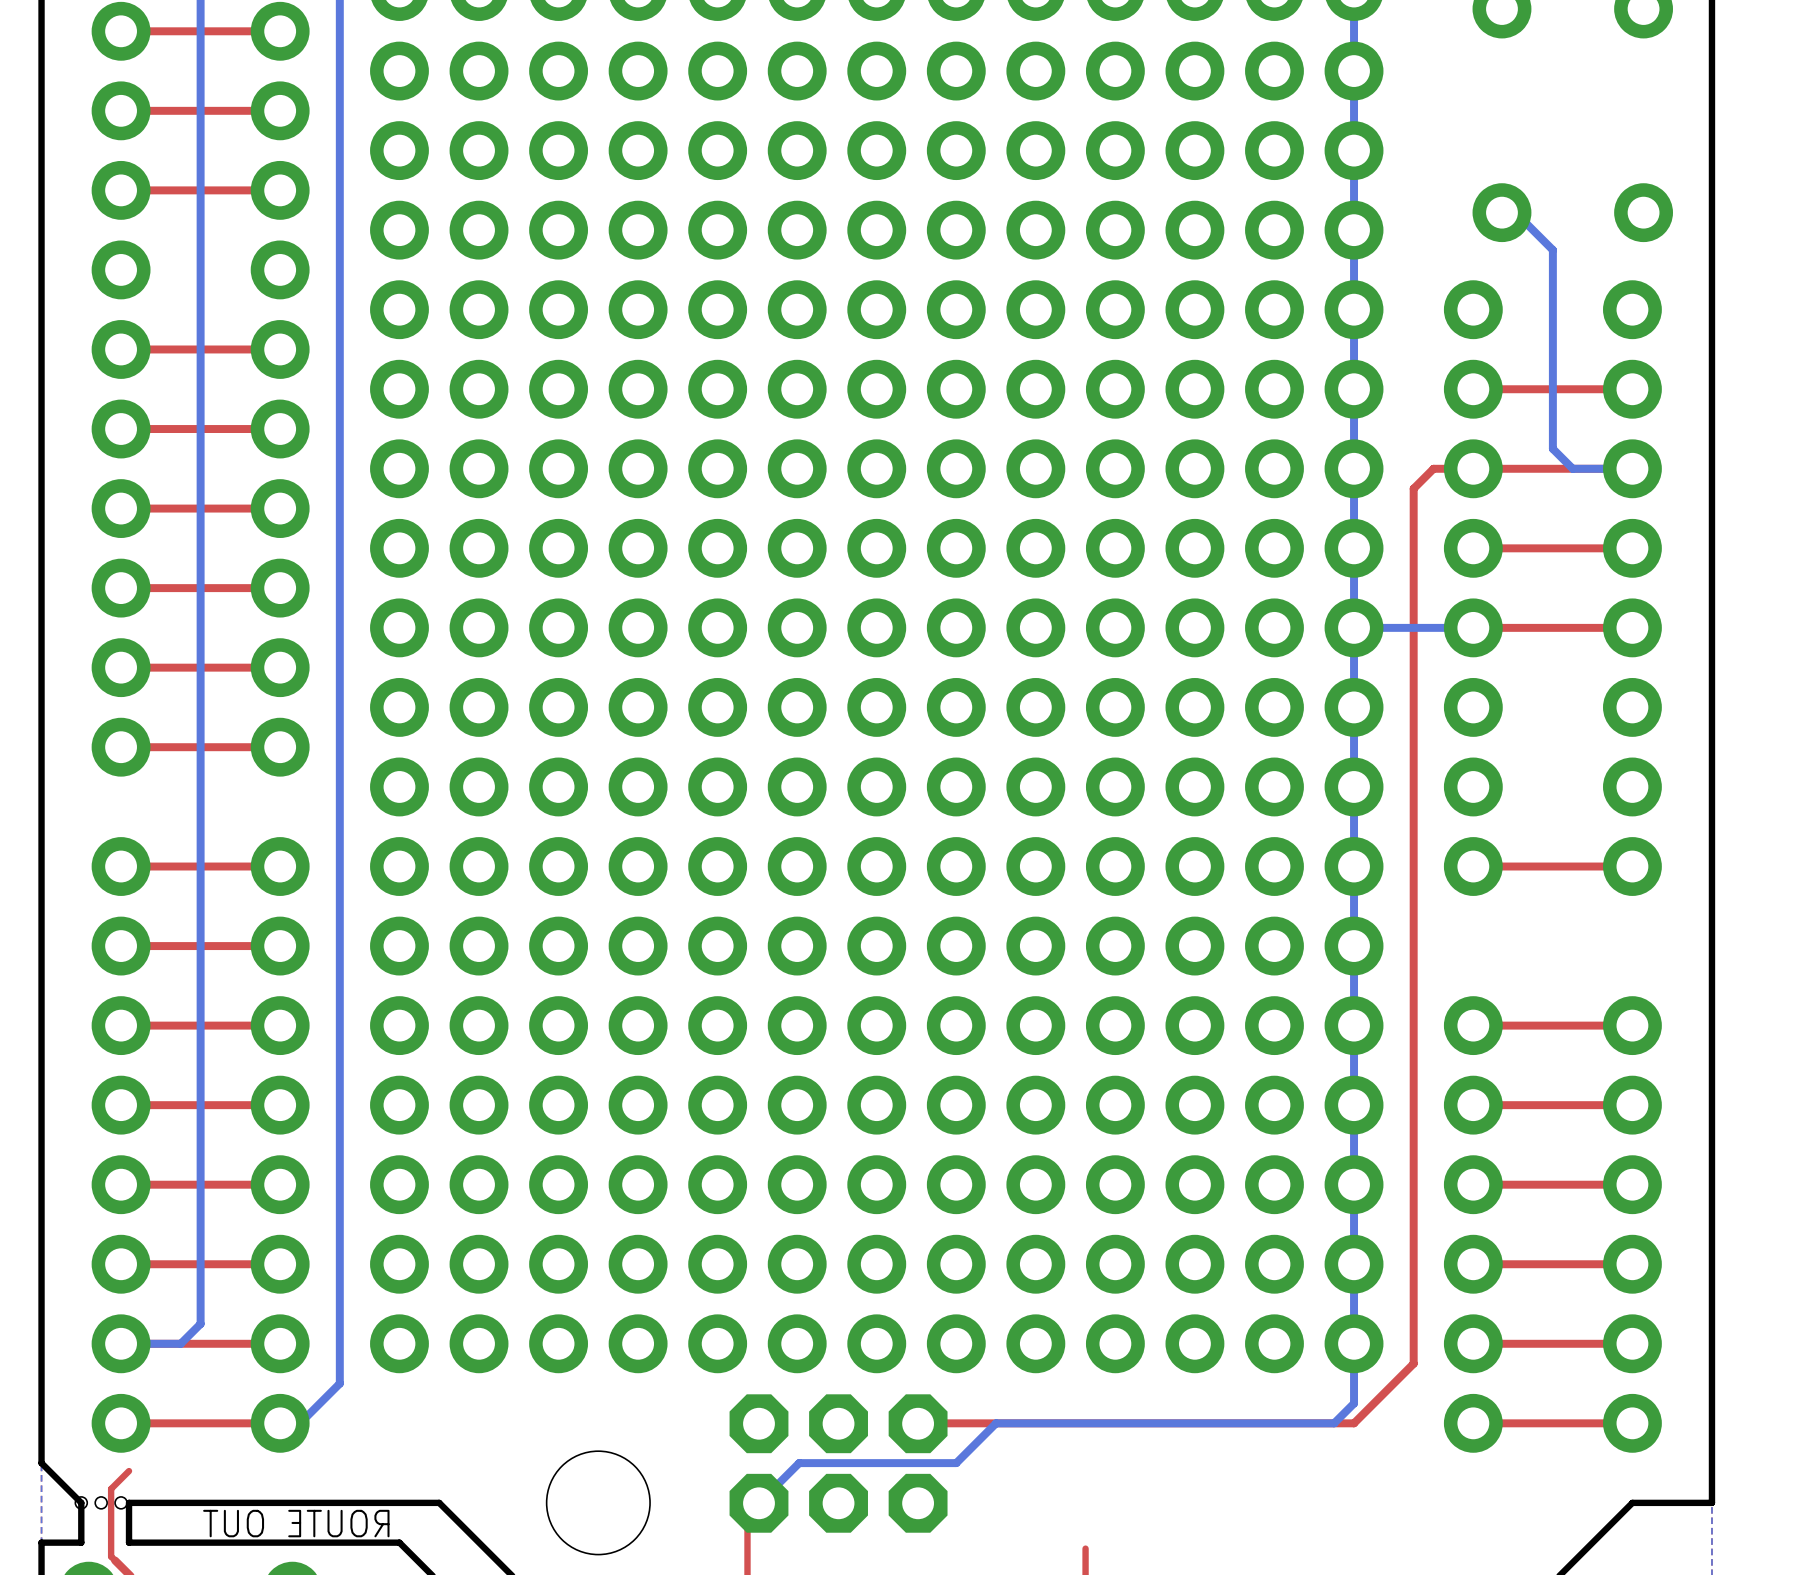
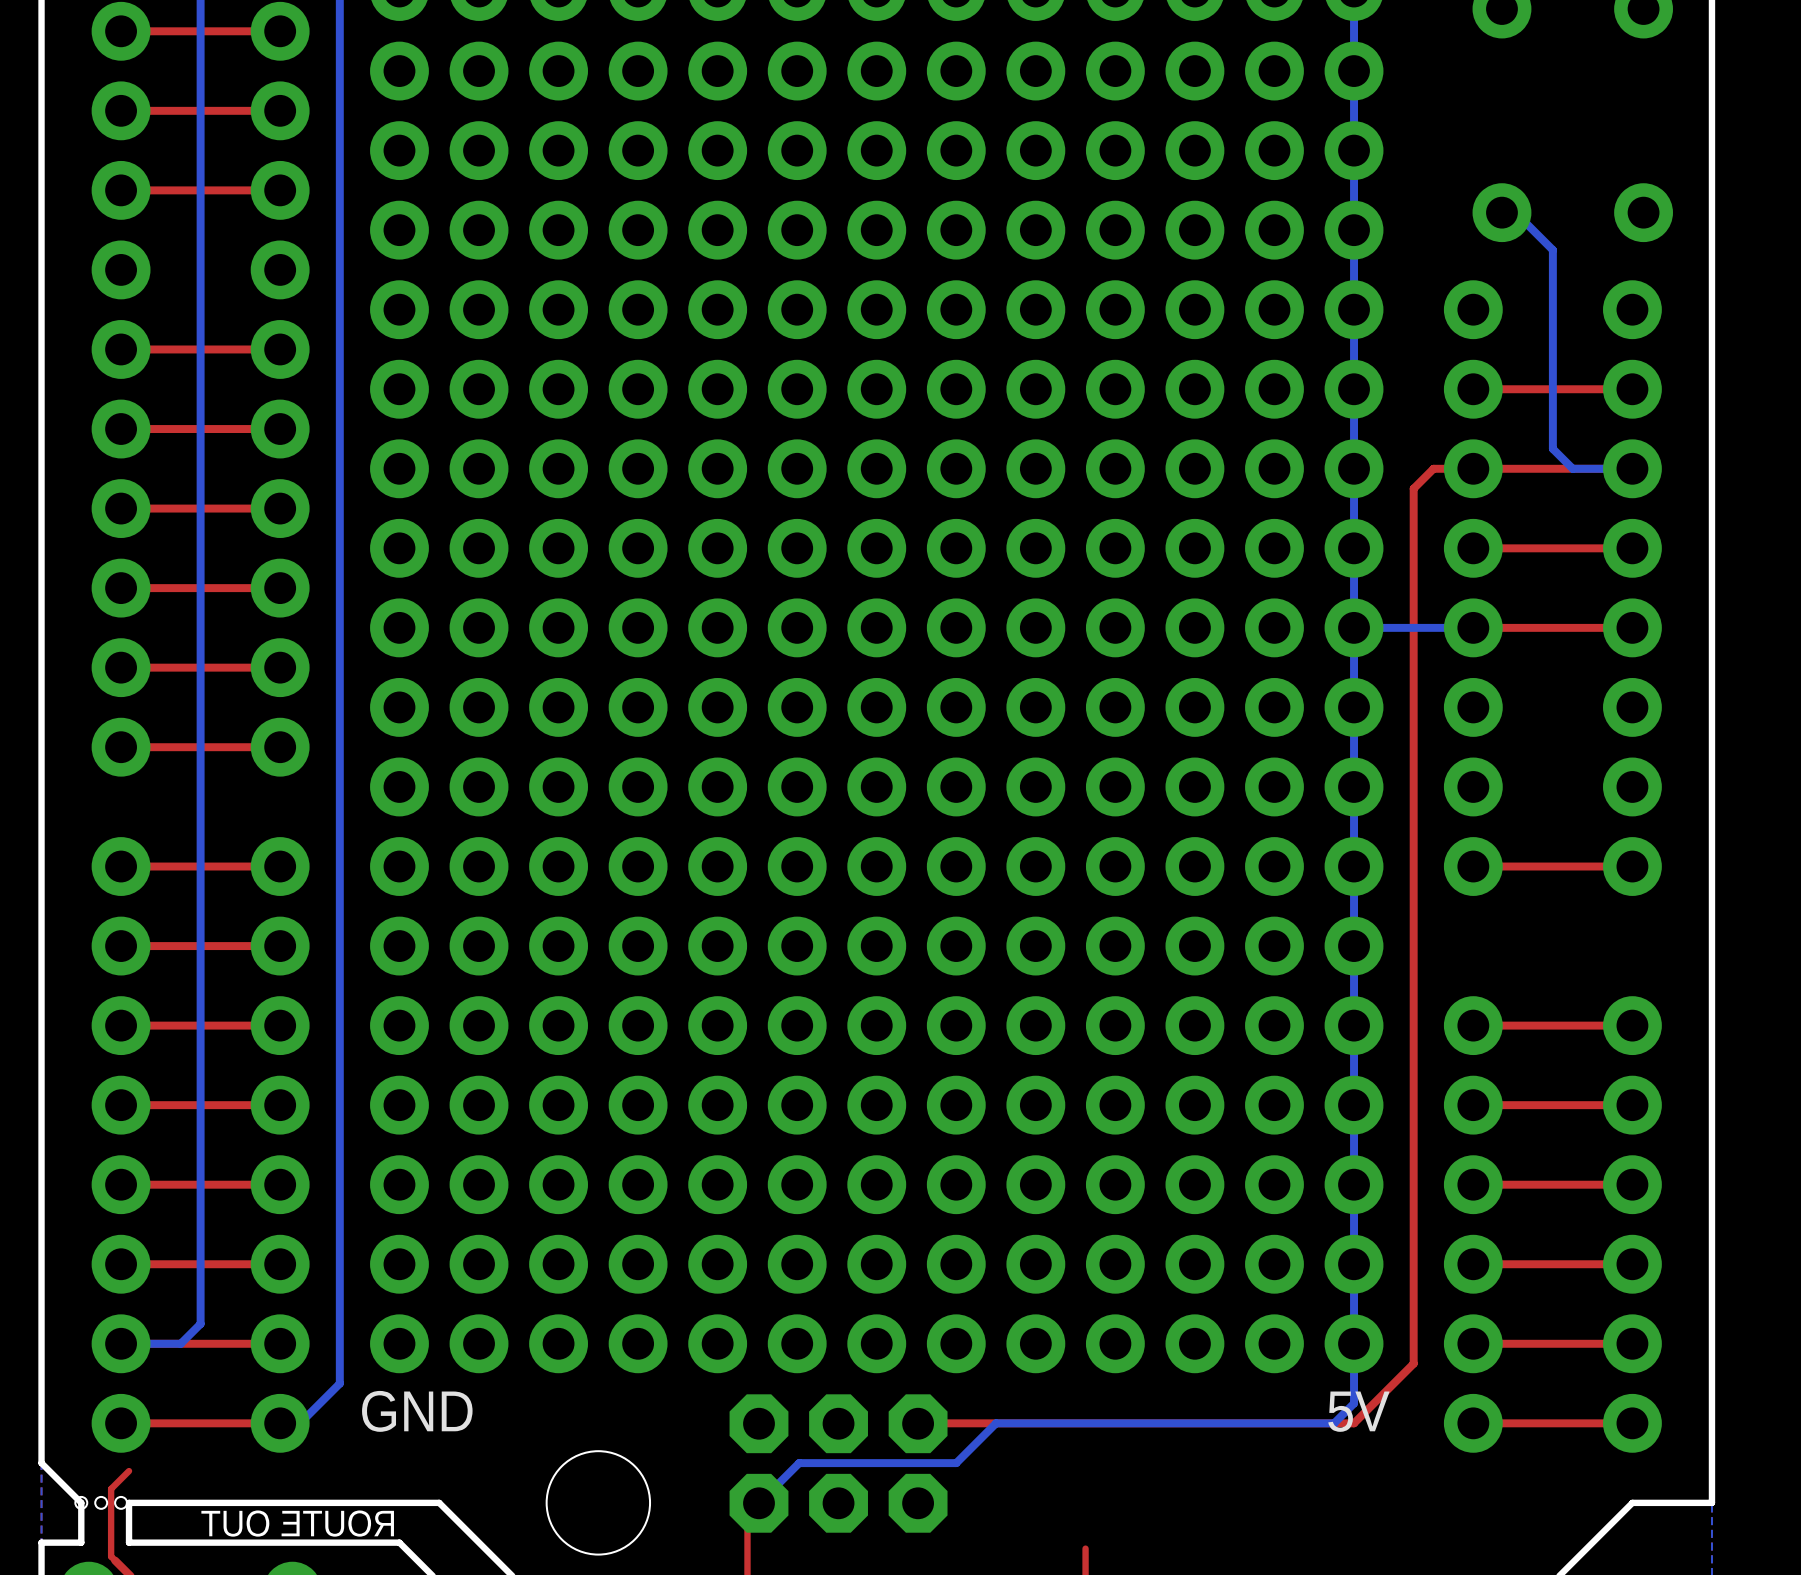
text: none -> GND (417, 1411)
text: none -> 5V (1358, 1411)

